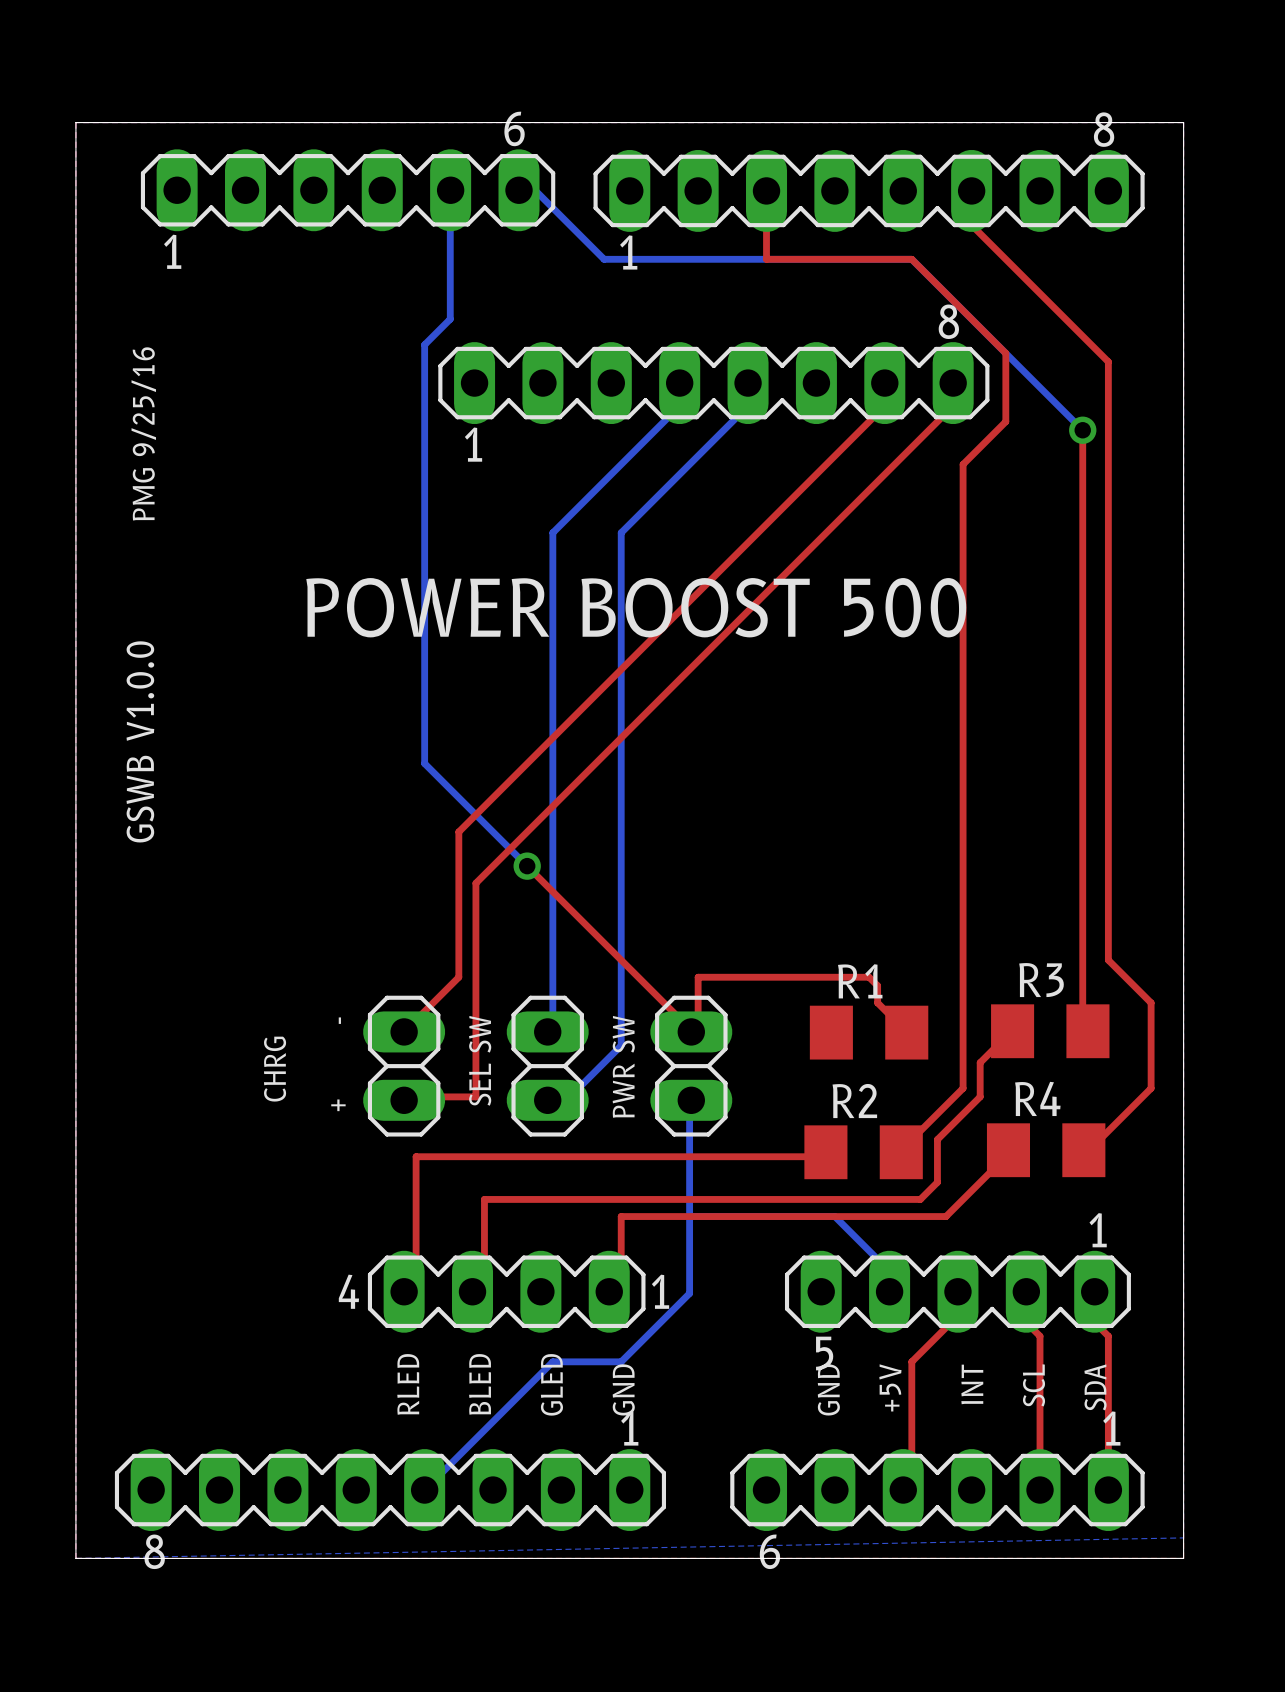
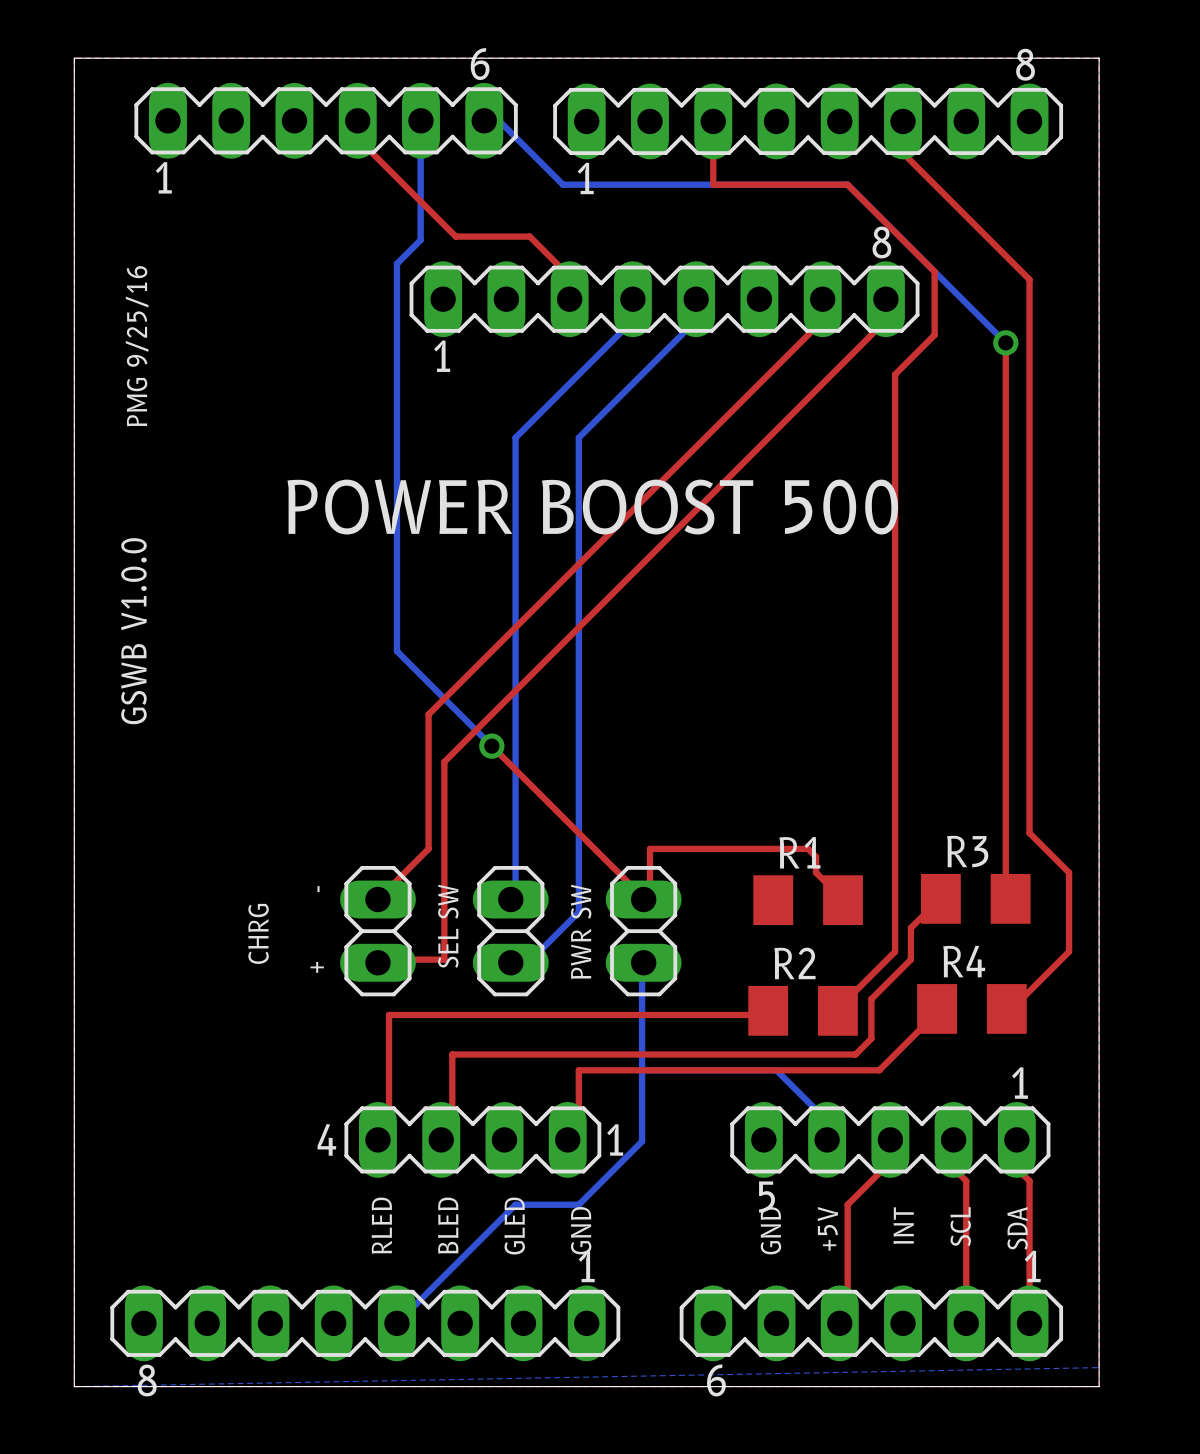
top track: none -> (357, 120) (359, 139) (455, 236) (529, 236) (569, 276) (569, 299)

